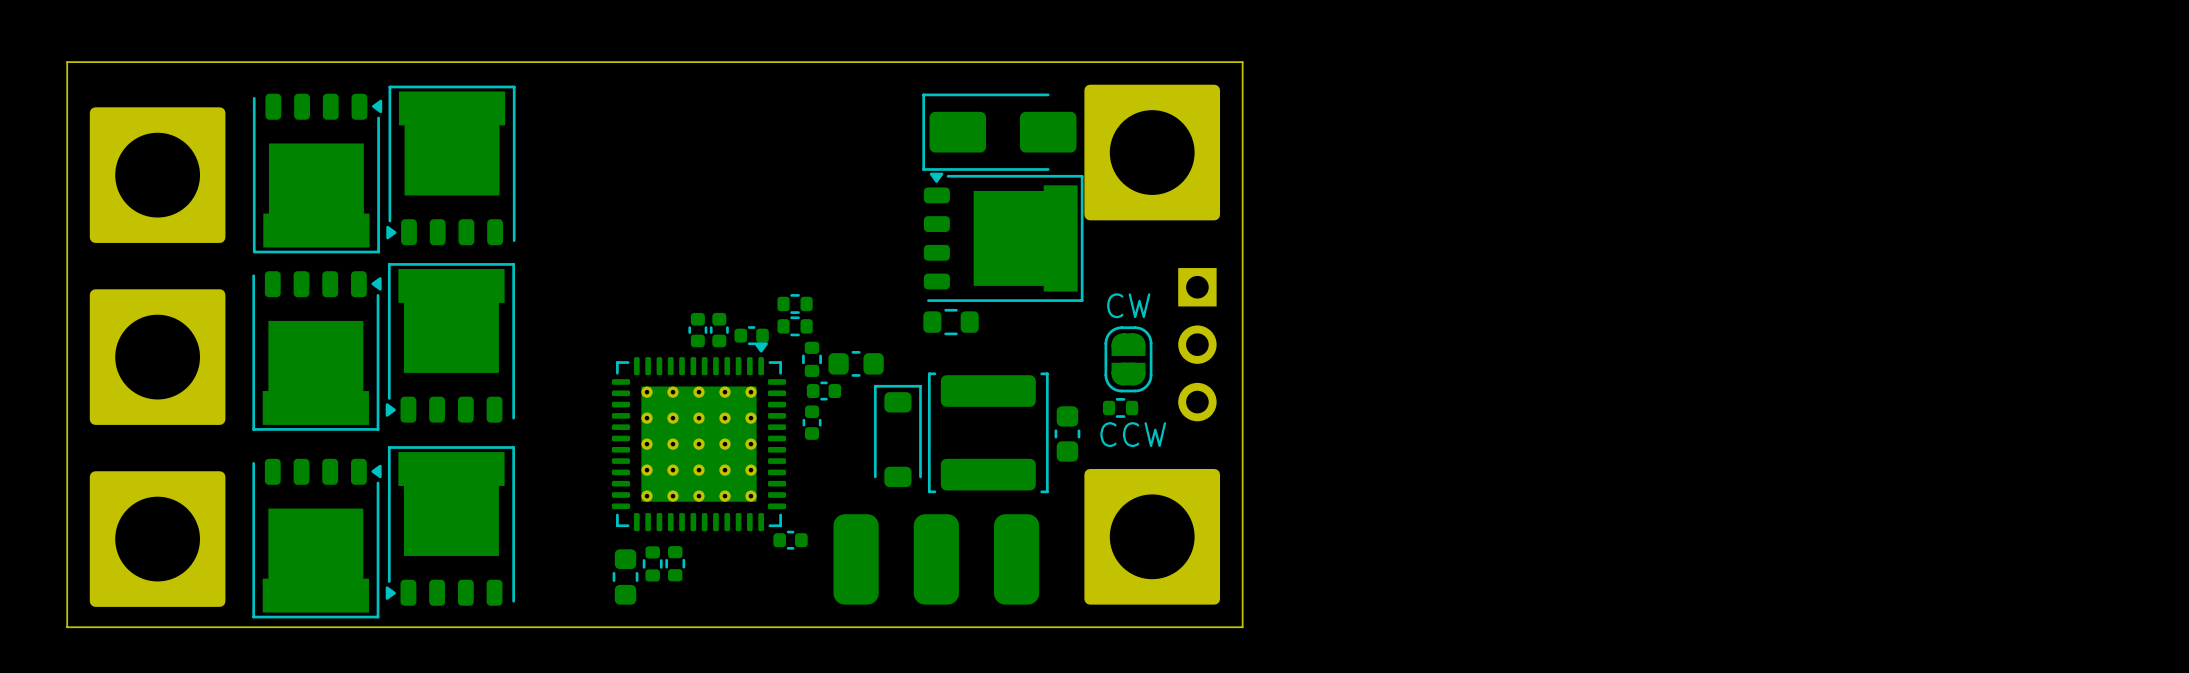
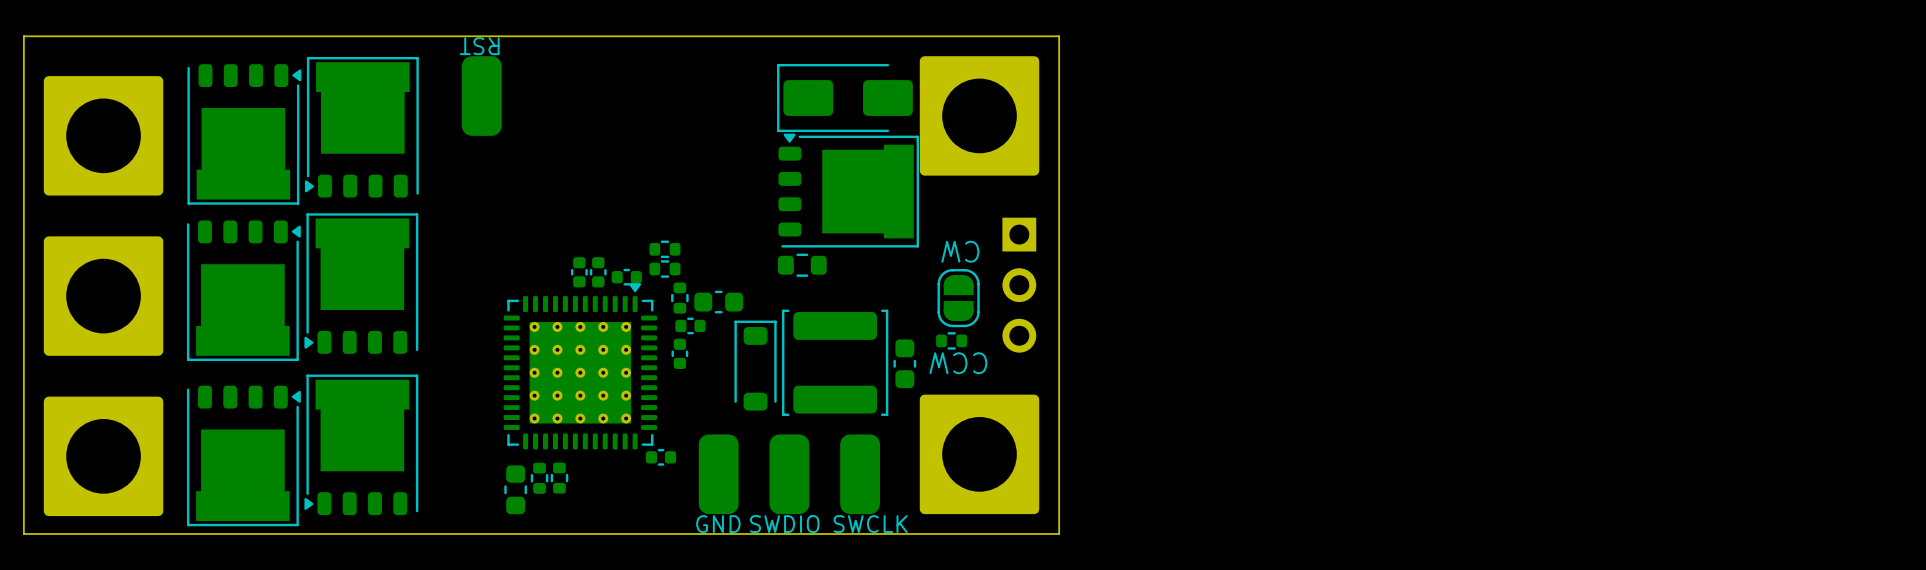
text: none -> RST (479, 46)
part: none -> (481, 96)
text rotation: 0° (1128, 305) -> 180° (960, 251)
text rotation: 0° (1133, 434) -> 180° (958, 363)
text: none -> GND (718, 524)
text: none -> SWDIO (784, 524)
text: none -> SWCLK (870, 524)

